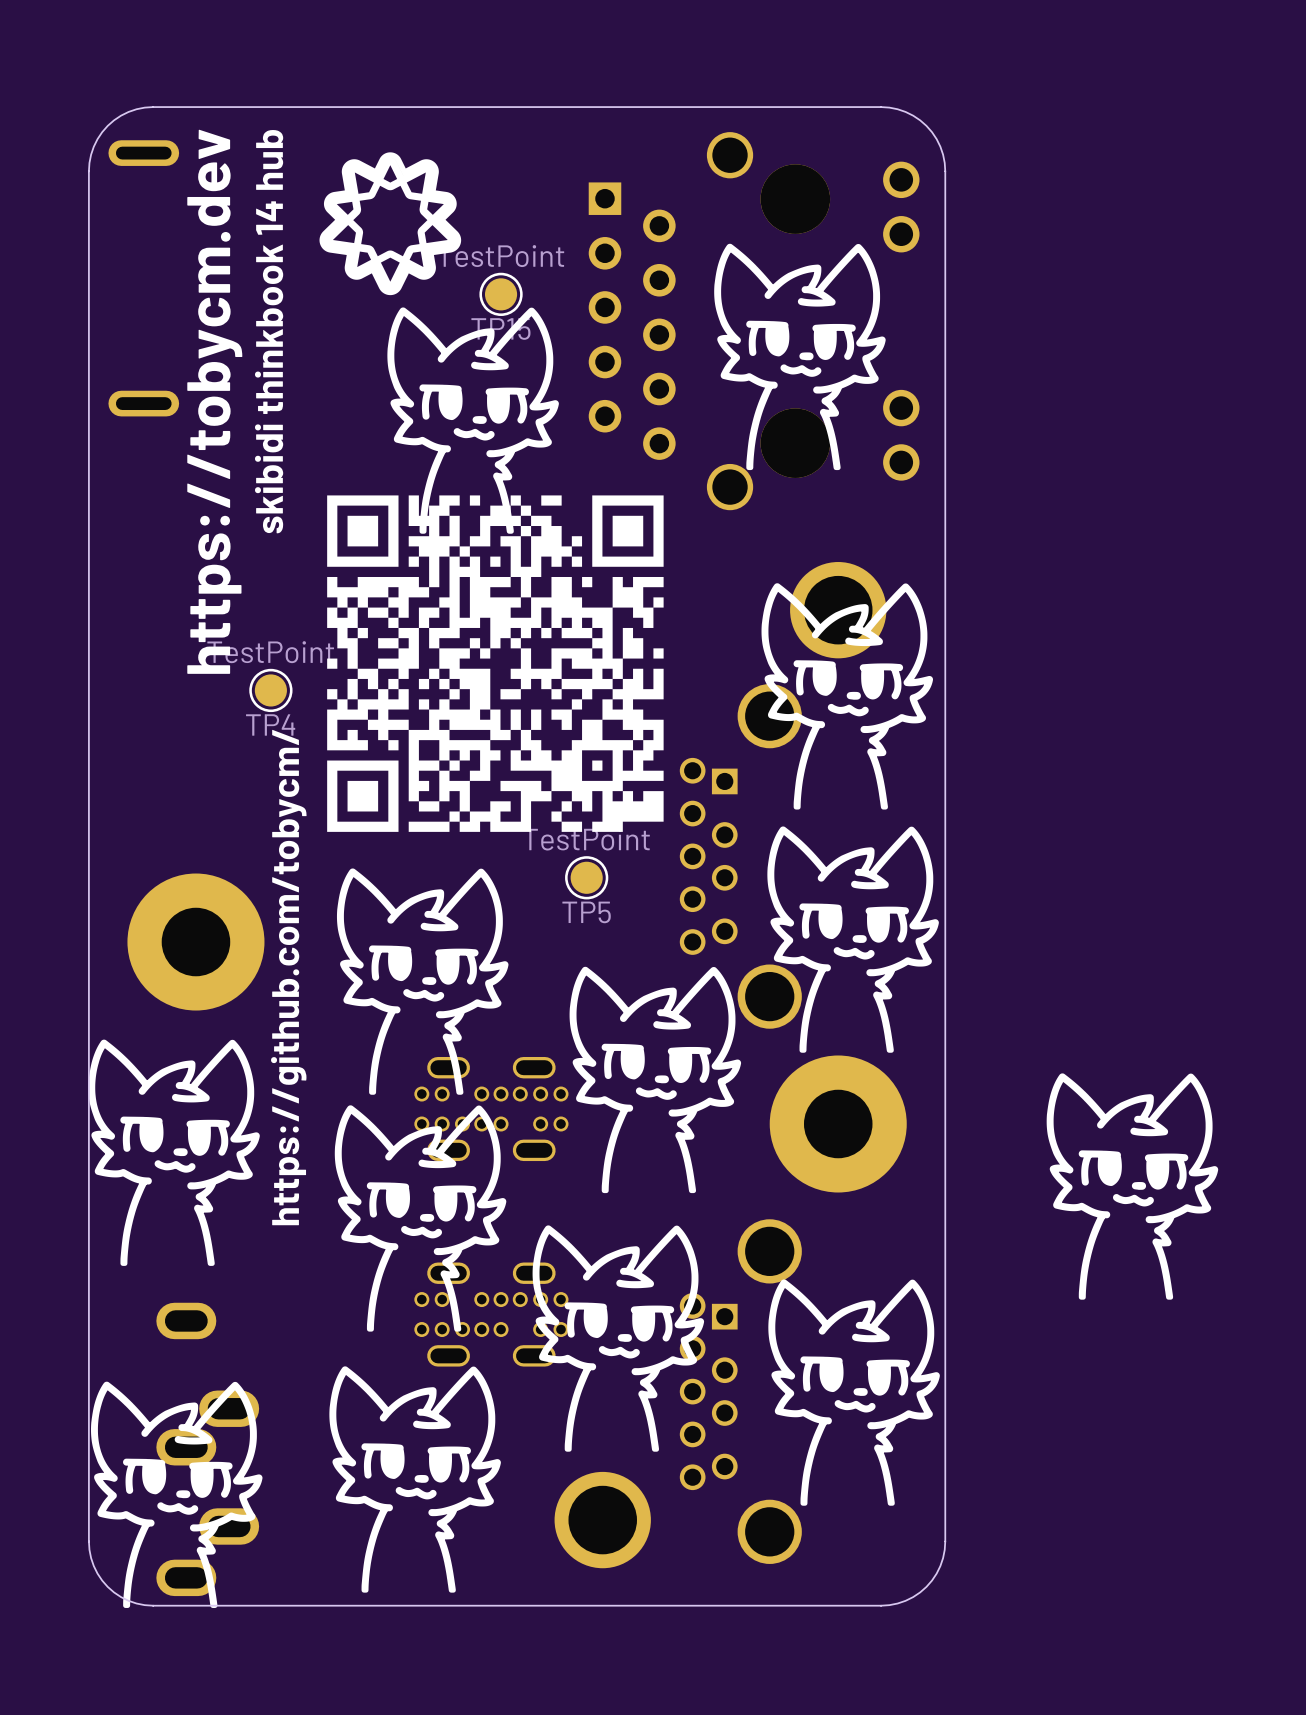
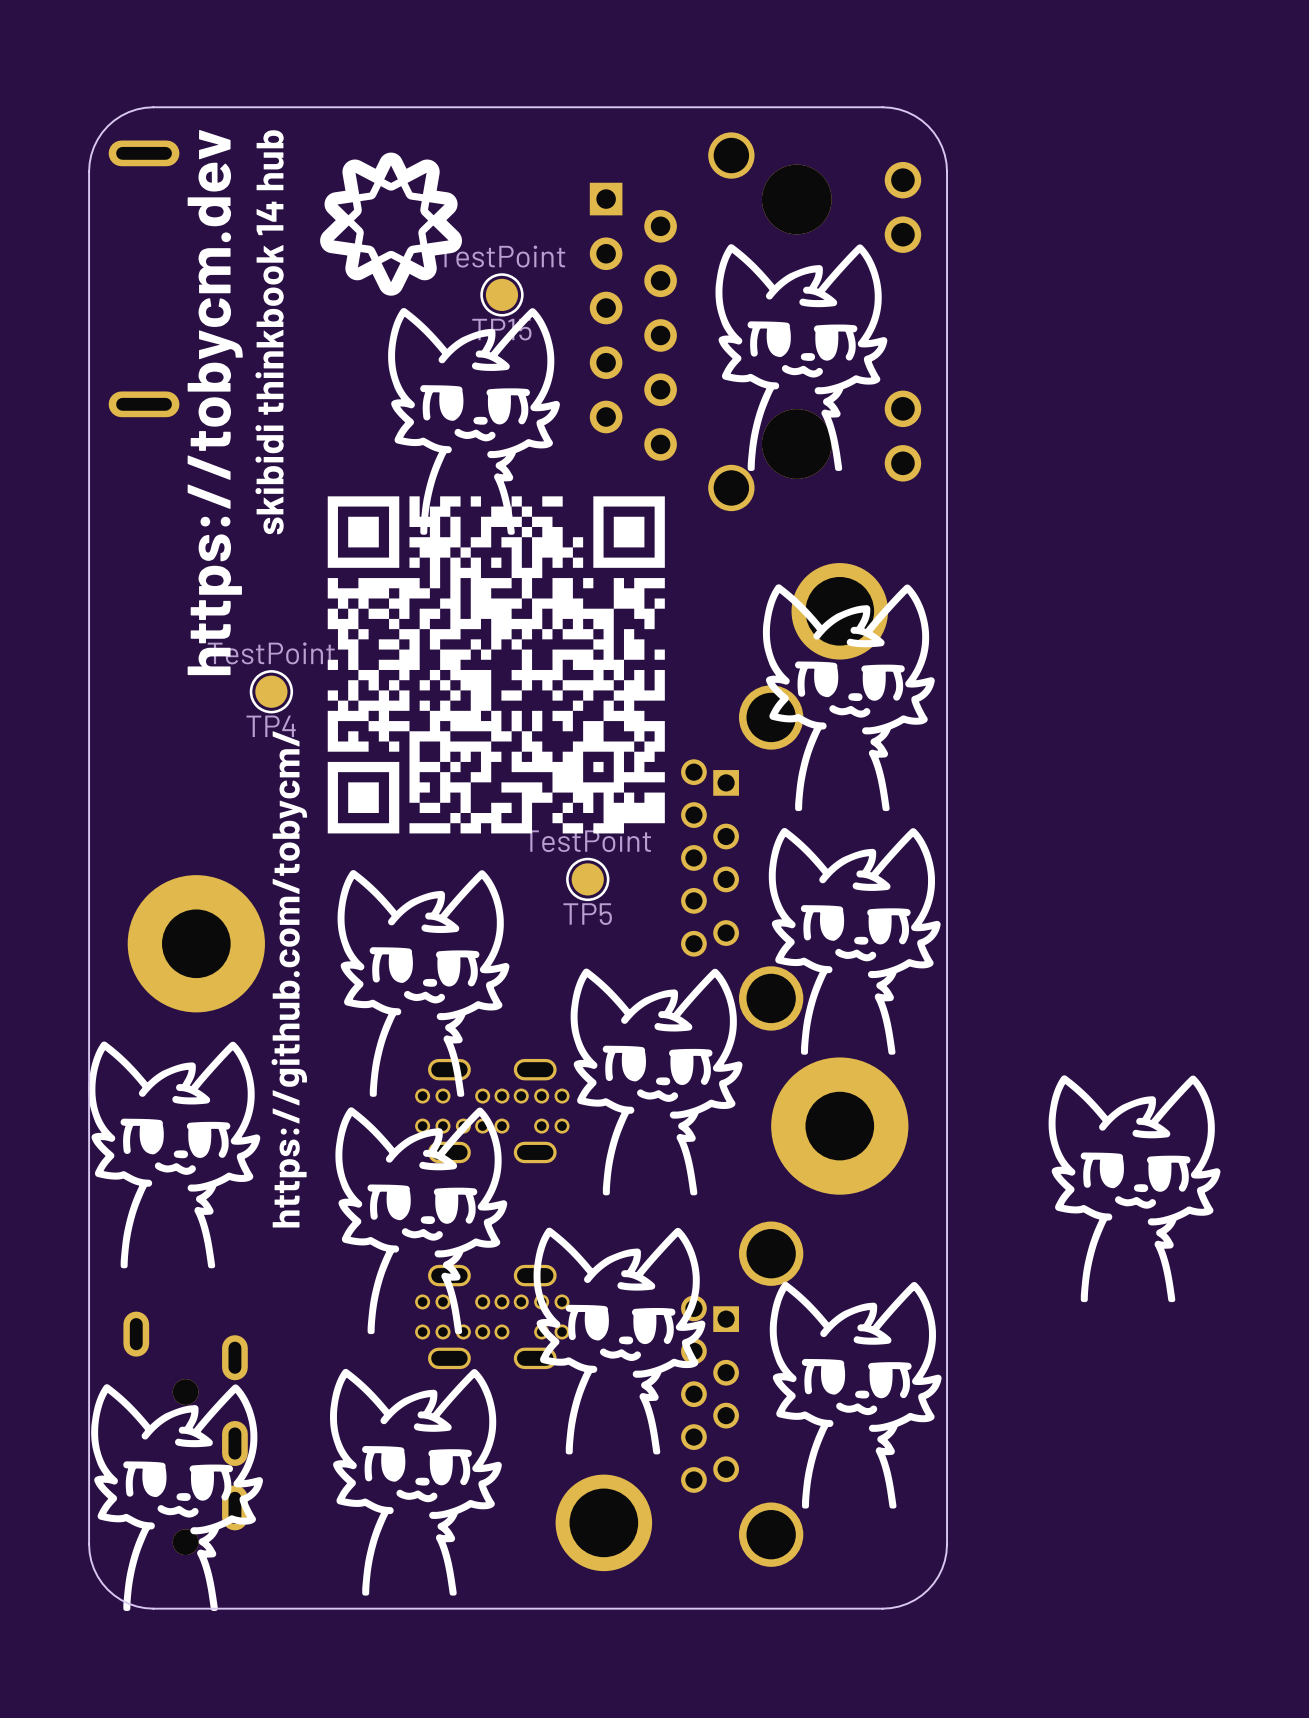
part: none -> (185, 1433)
part: (207, 1449) -> none

